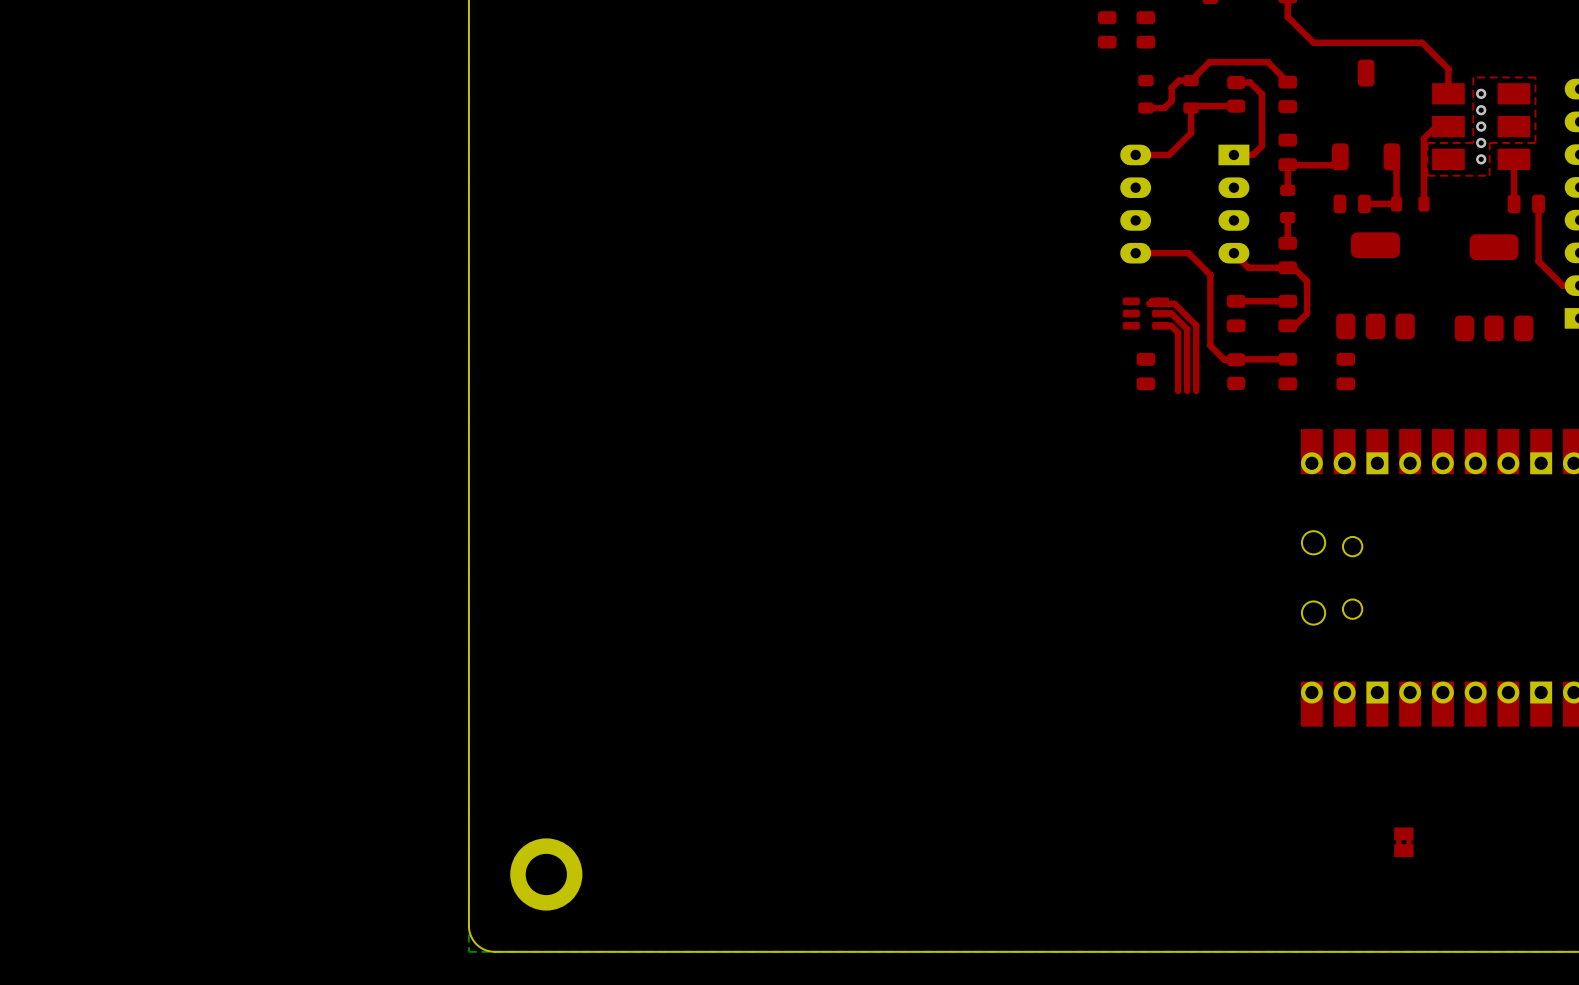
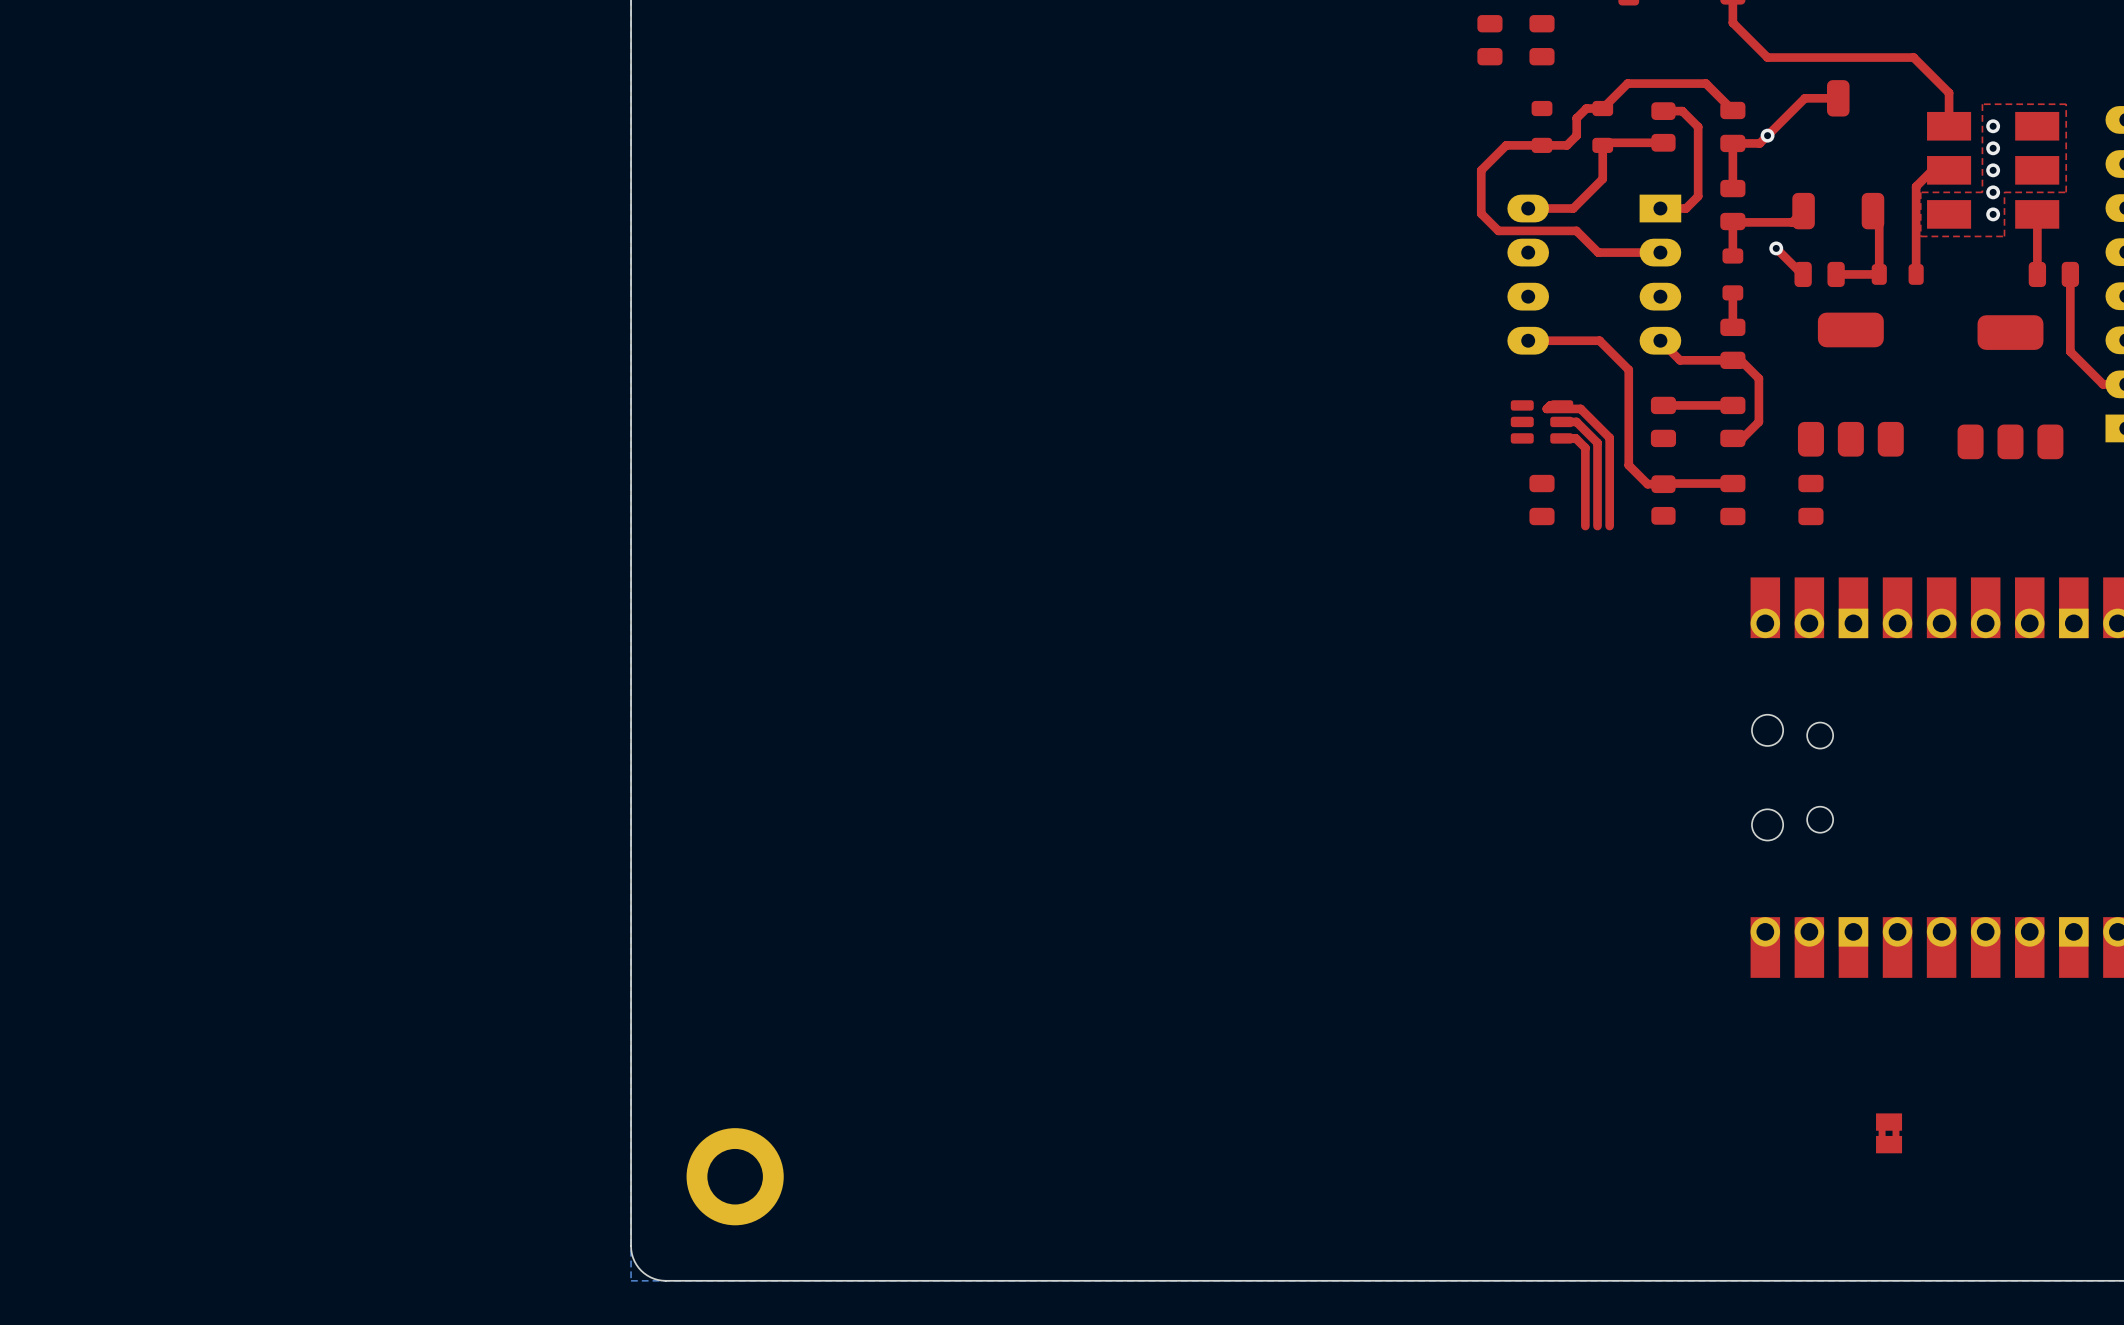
top track: none -> (1838, 98) (1804, 98) (1759, 143) (1732, 143) (1732, 188)
via: none -> (1767, 135)
top track: none -> (1542, 145) (1506, 145) (1481, 170) (1481, 213) (1498, 230) (1576, 230) (1598, 252) (1660, 252)
top track: none -> (1776, 248) (1803, 274)
via: none -> (1776, 248)

